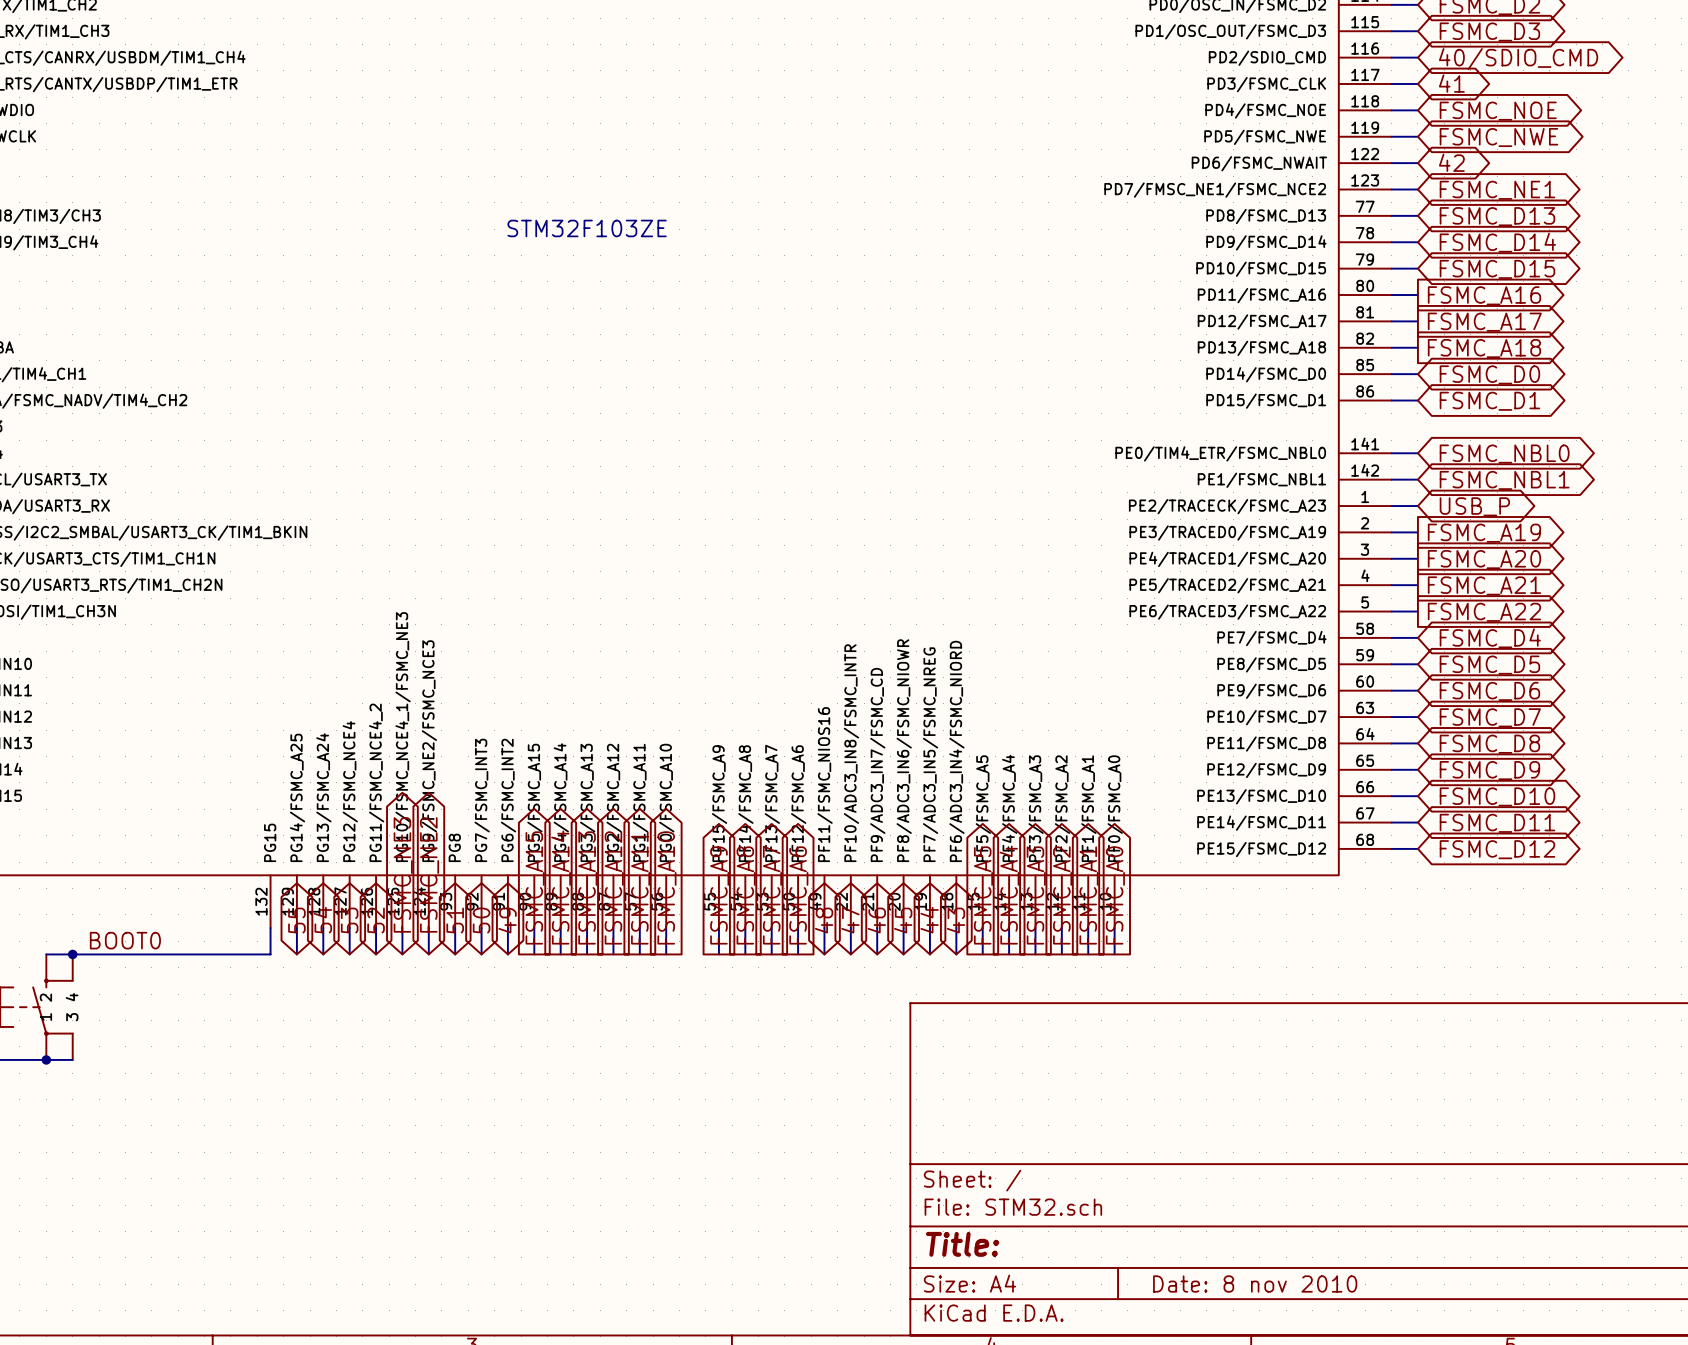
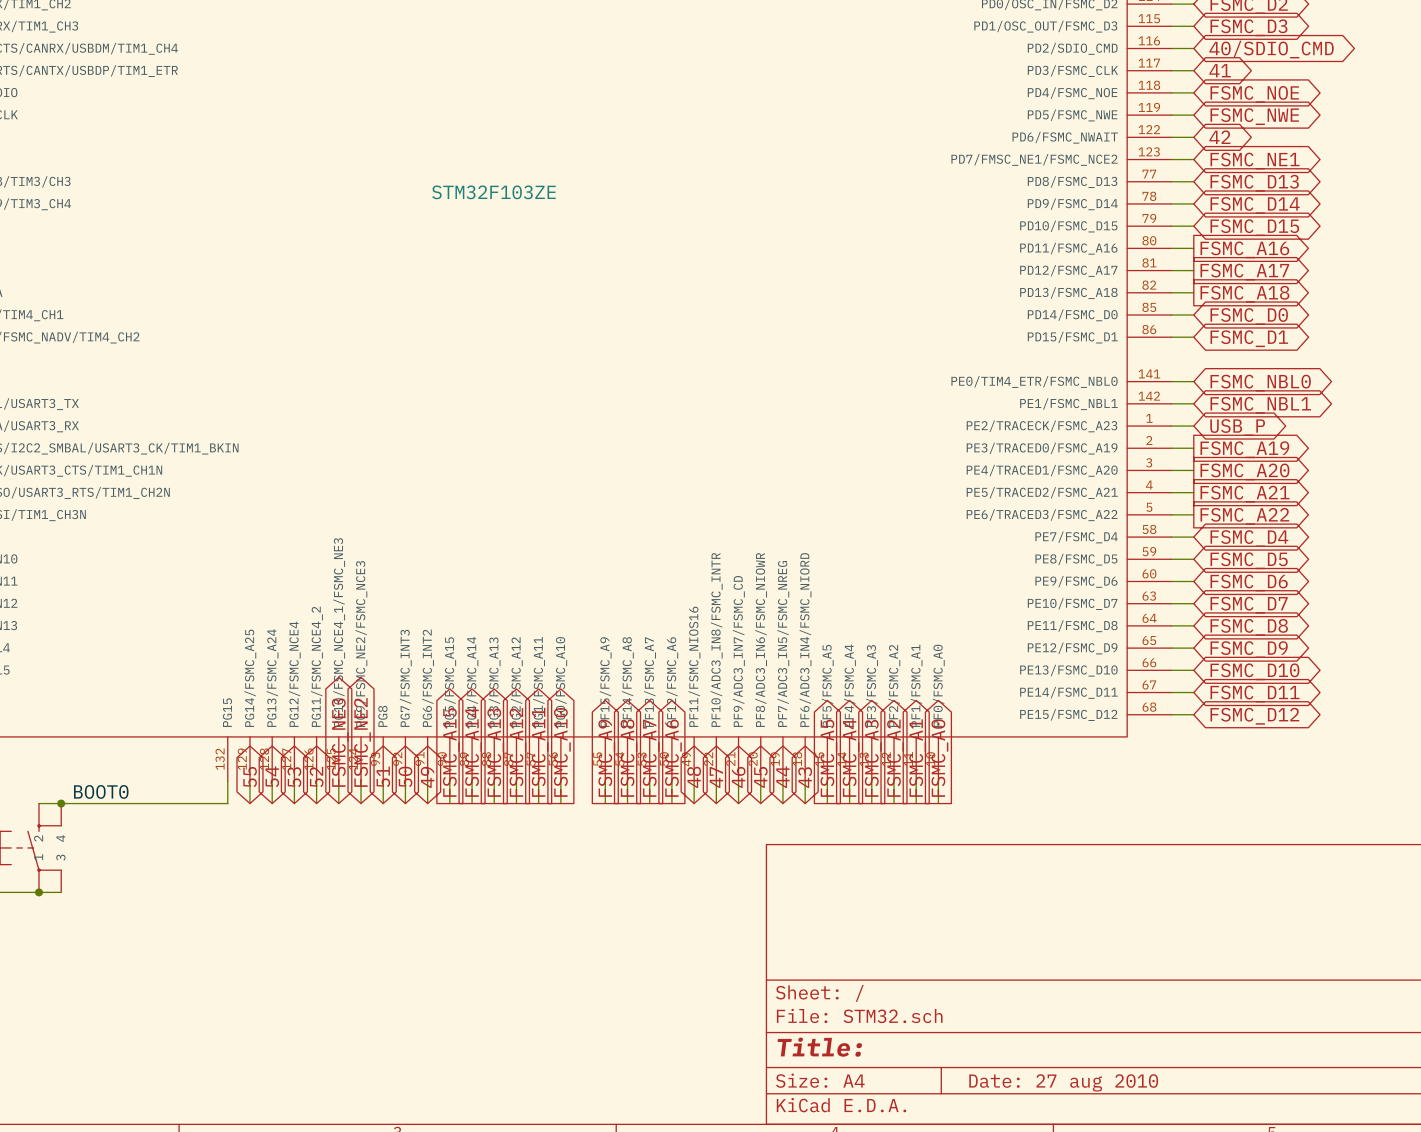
title block: Date: 8 nov 2010 (1255, 1284) -> Date: 27 aug 2010 (1063, 1082)

